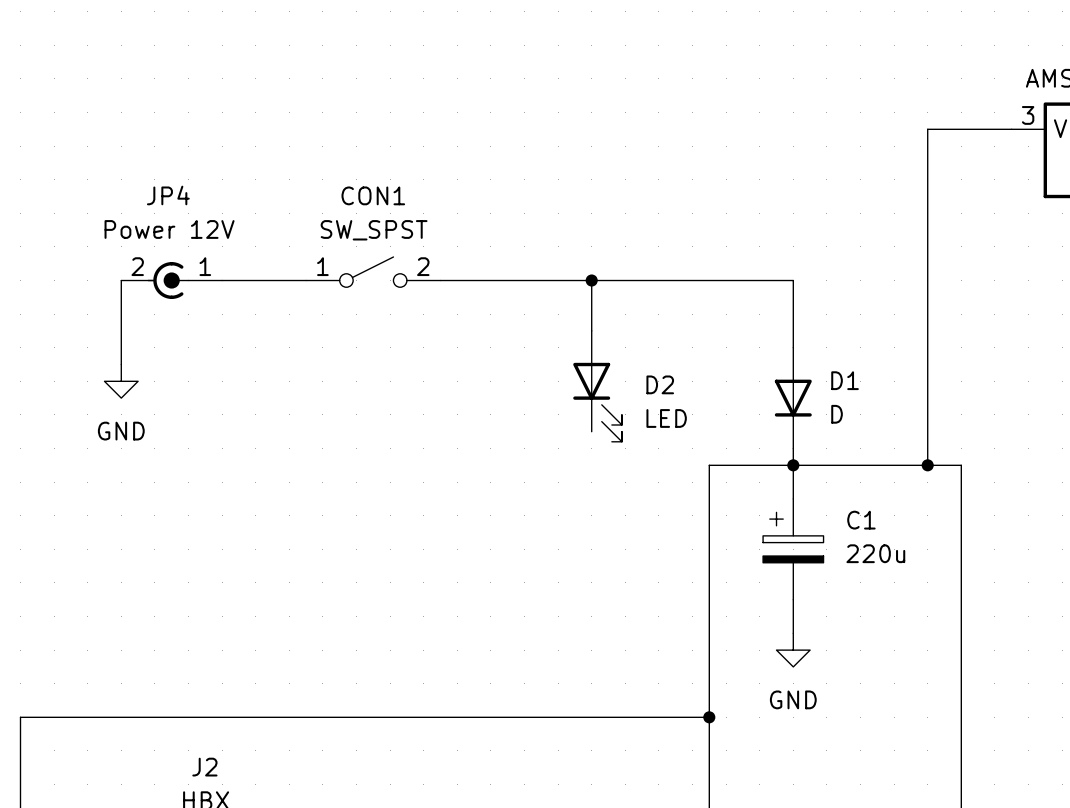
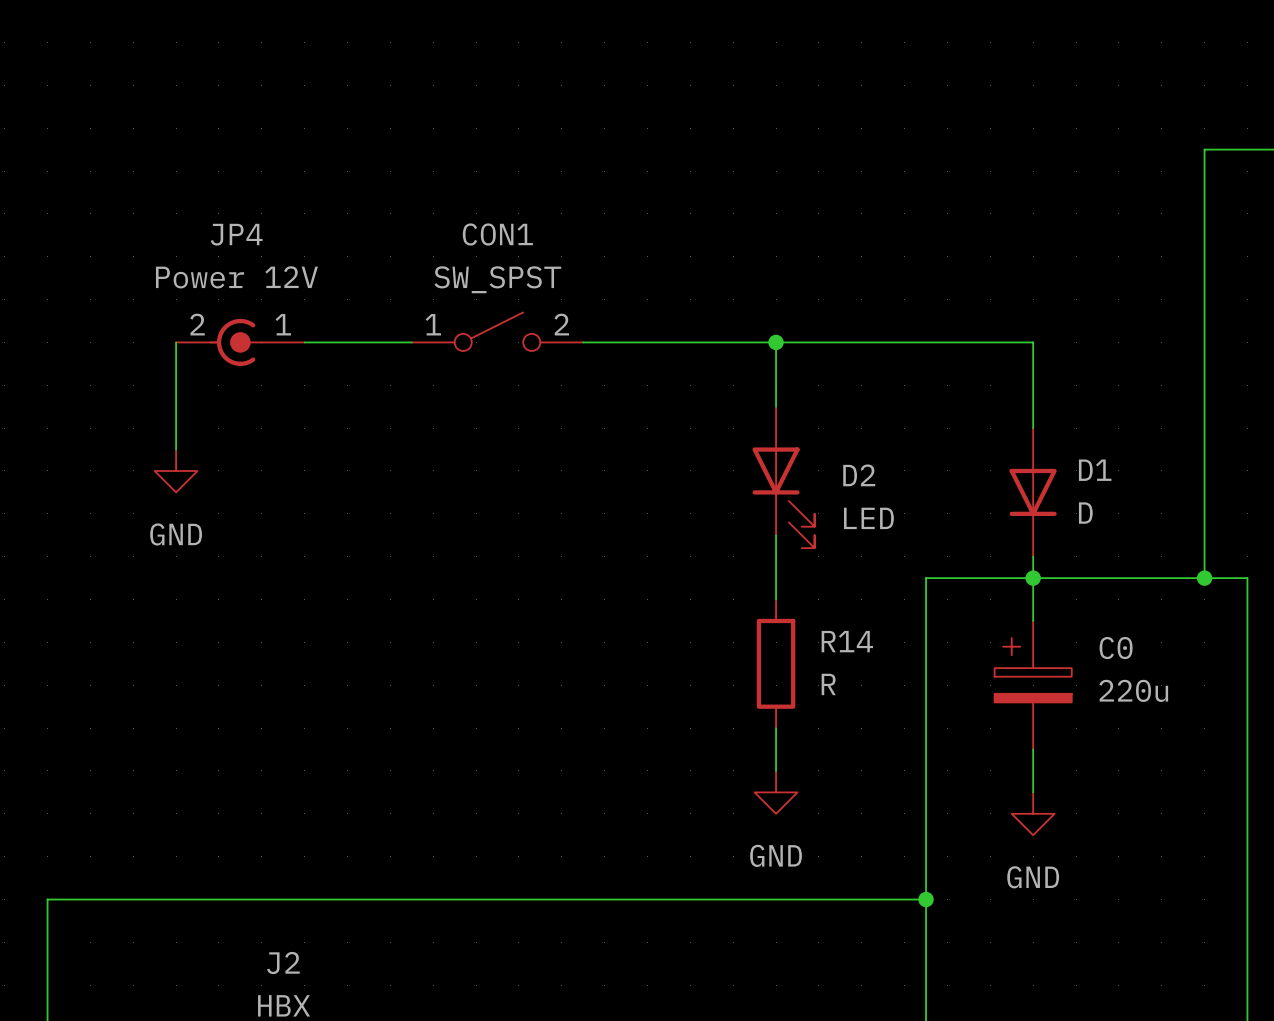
wire: none -> (776, 535) (776, 599)
C1 name: C1 (861, 520) -> C0 (1116, 648)
R14: none -> R (776, 663)
wire: none -> (776, 728) (776, 770)
power symbol: none -> GND (776, 792)

